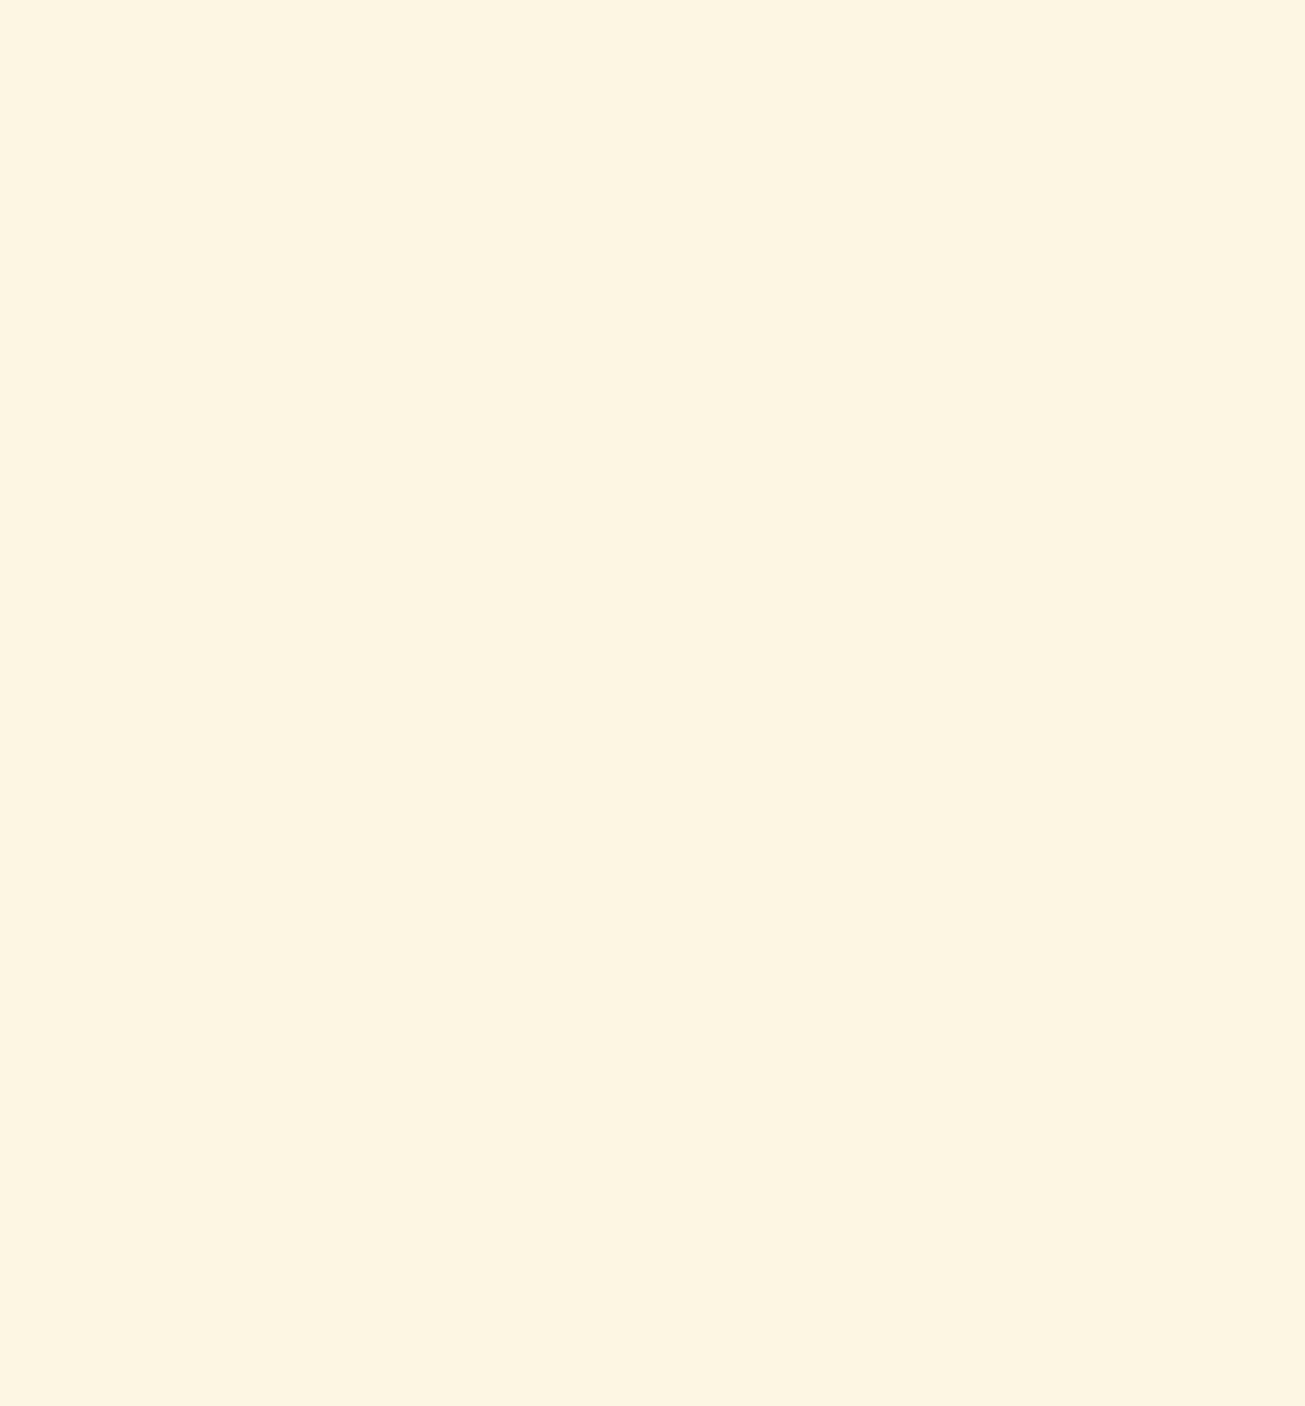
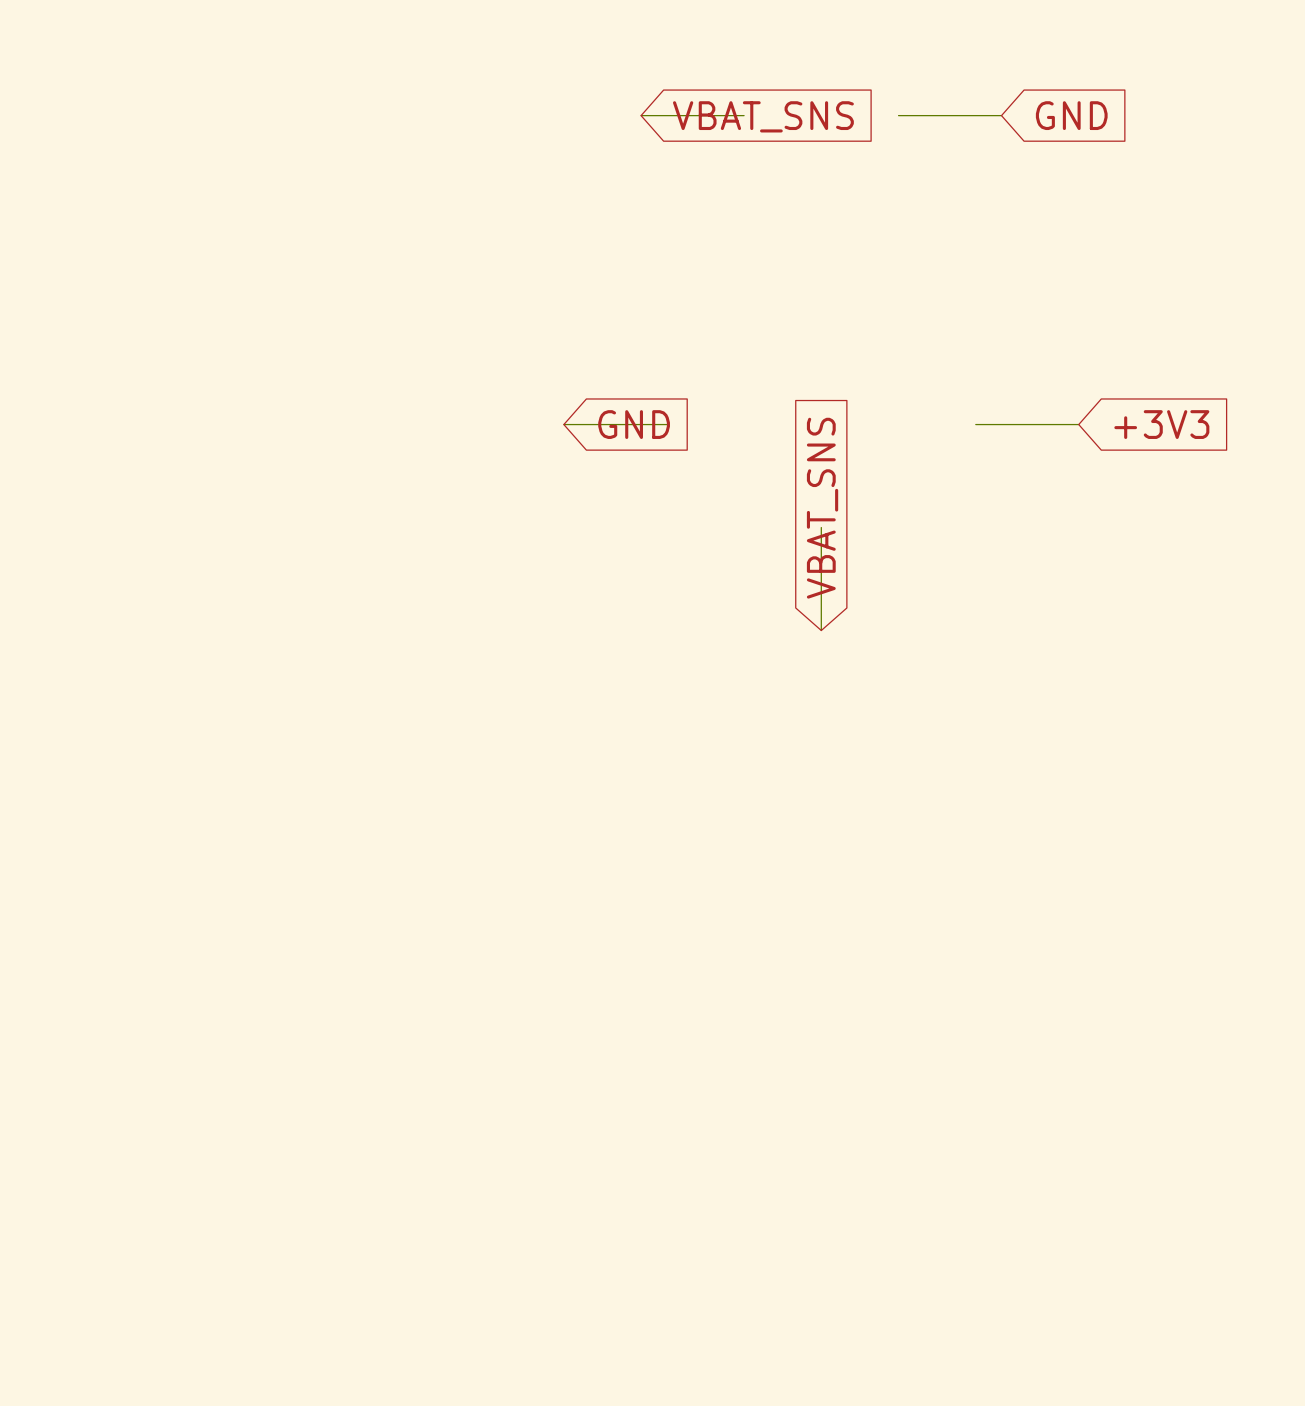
wire: none -> (641, 115) (744, 115)
wire: none -> (898, 115) (1001, 115)
global label: none -> GND (1071, 115)
global label: none -> VBAT_SNS (763, 116)
wire: none -> (563, 424) (666, 424)
global label: none -> GND (634, 424)
wire: none -> (975, 424) (1078, 424)
global label: none -> +3V3 (1161, 424)
global label: none -> VBAT_SNS (822, 508)
wire: none -> (821, 527) (821, 630)

